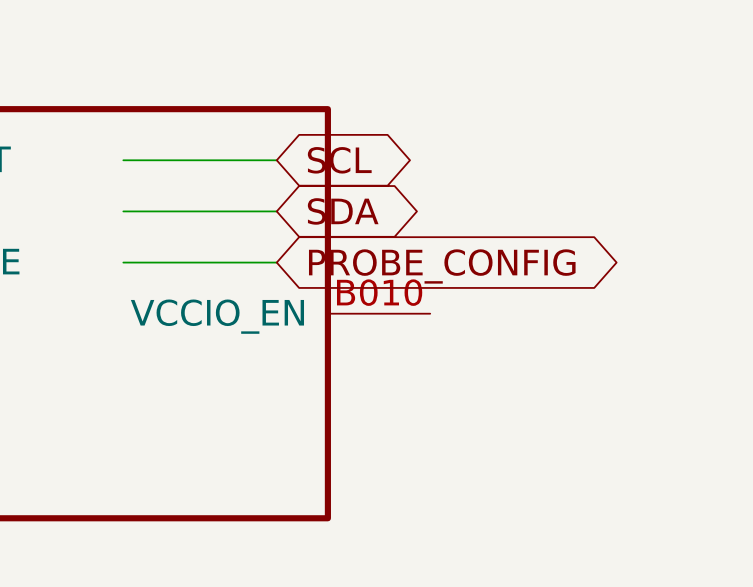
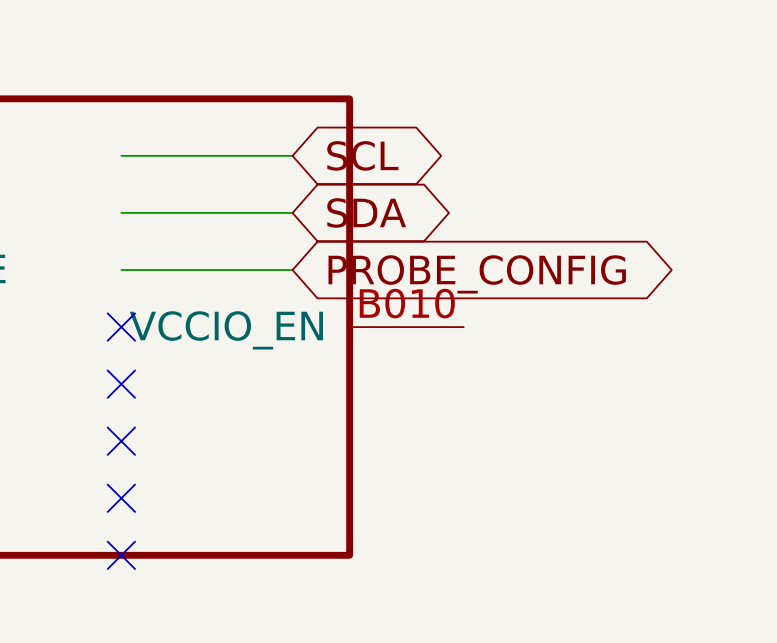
no-connect mark: none -> (121, 327)
no-connect mark: none -> (121, 384)
no-connect mark: none -> (121, 441)
no-connect mark: none -> (121, 498)
no-connect mark: none -> (121, 555)

